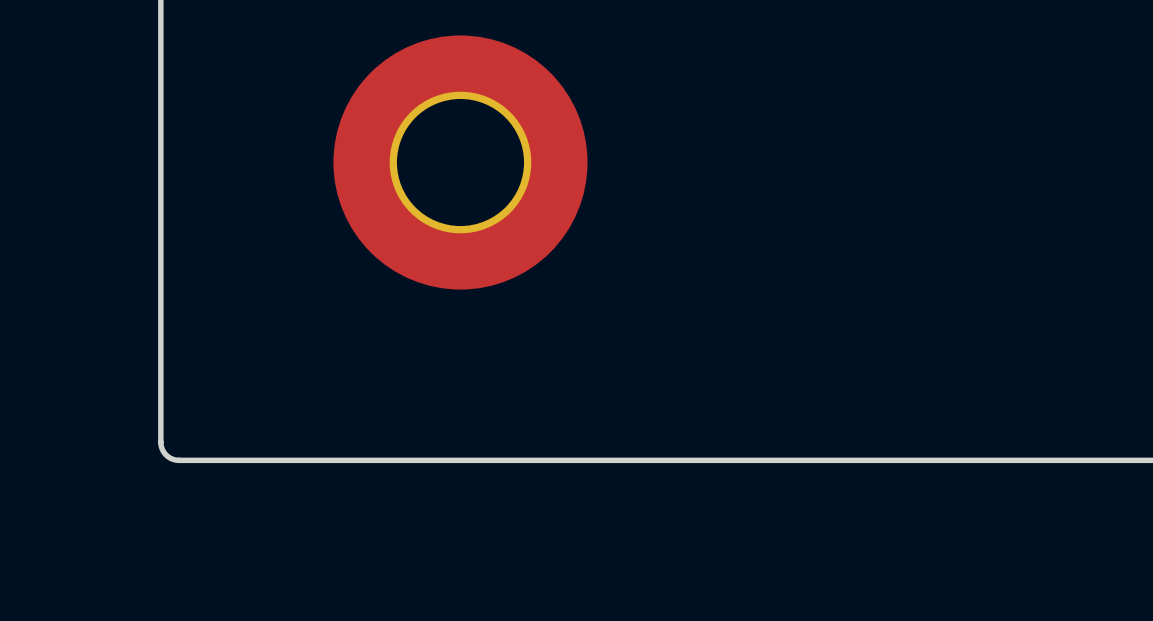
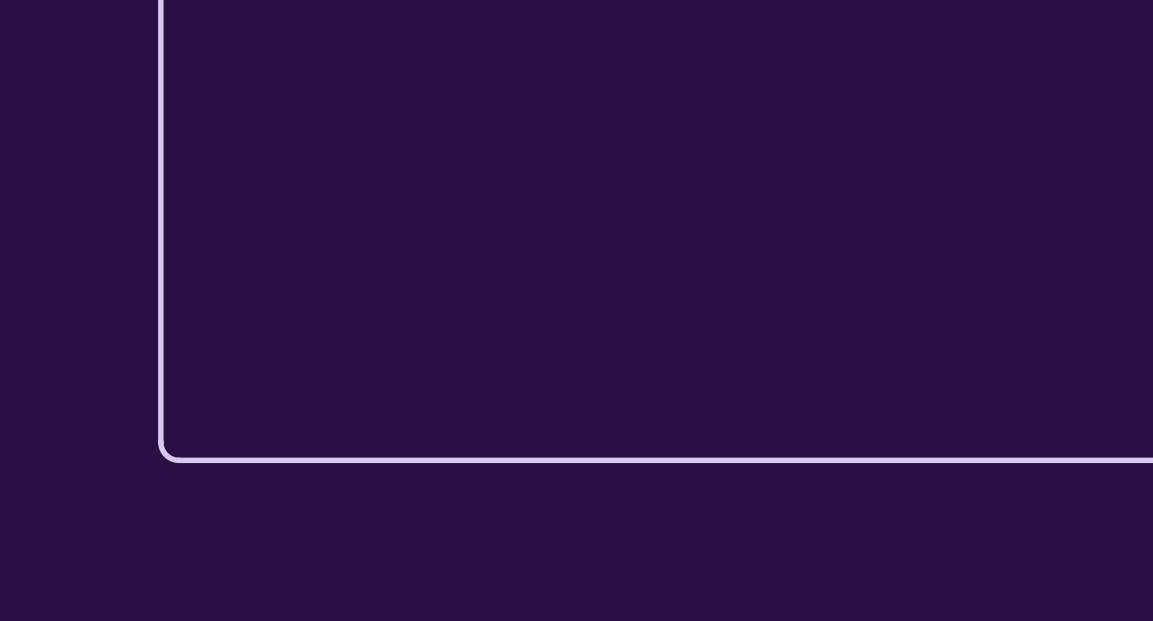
part: (460, 162) -> none

